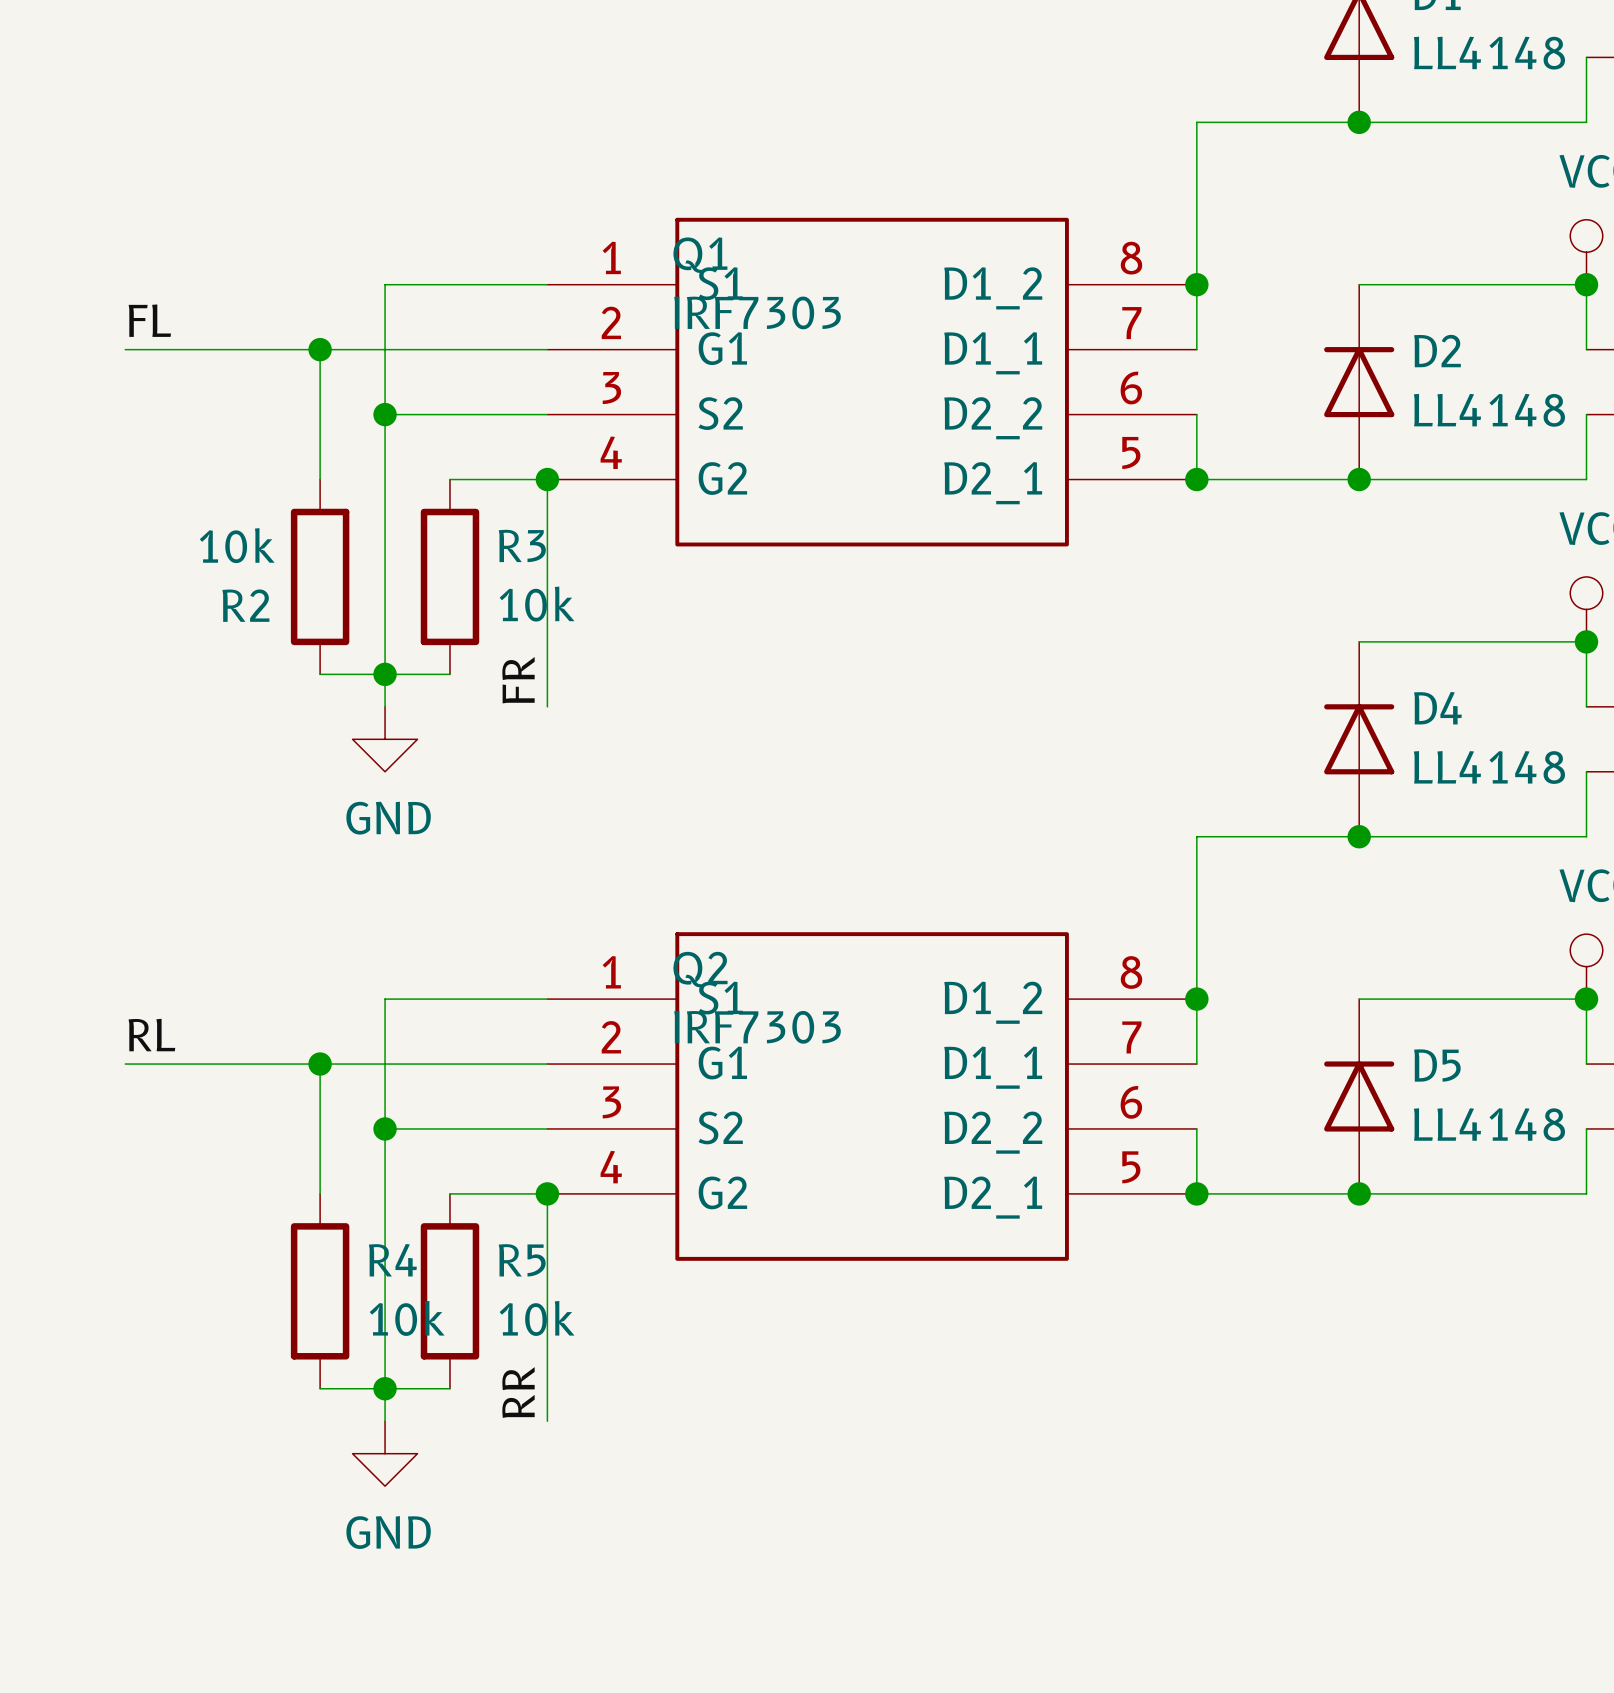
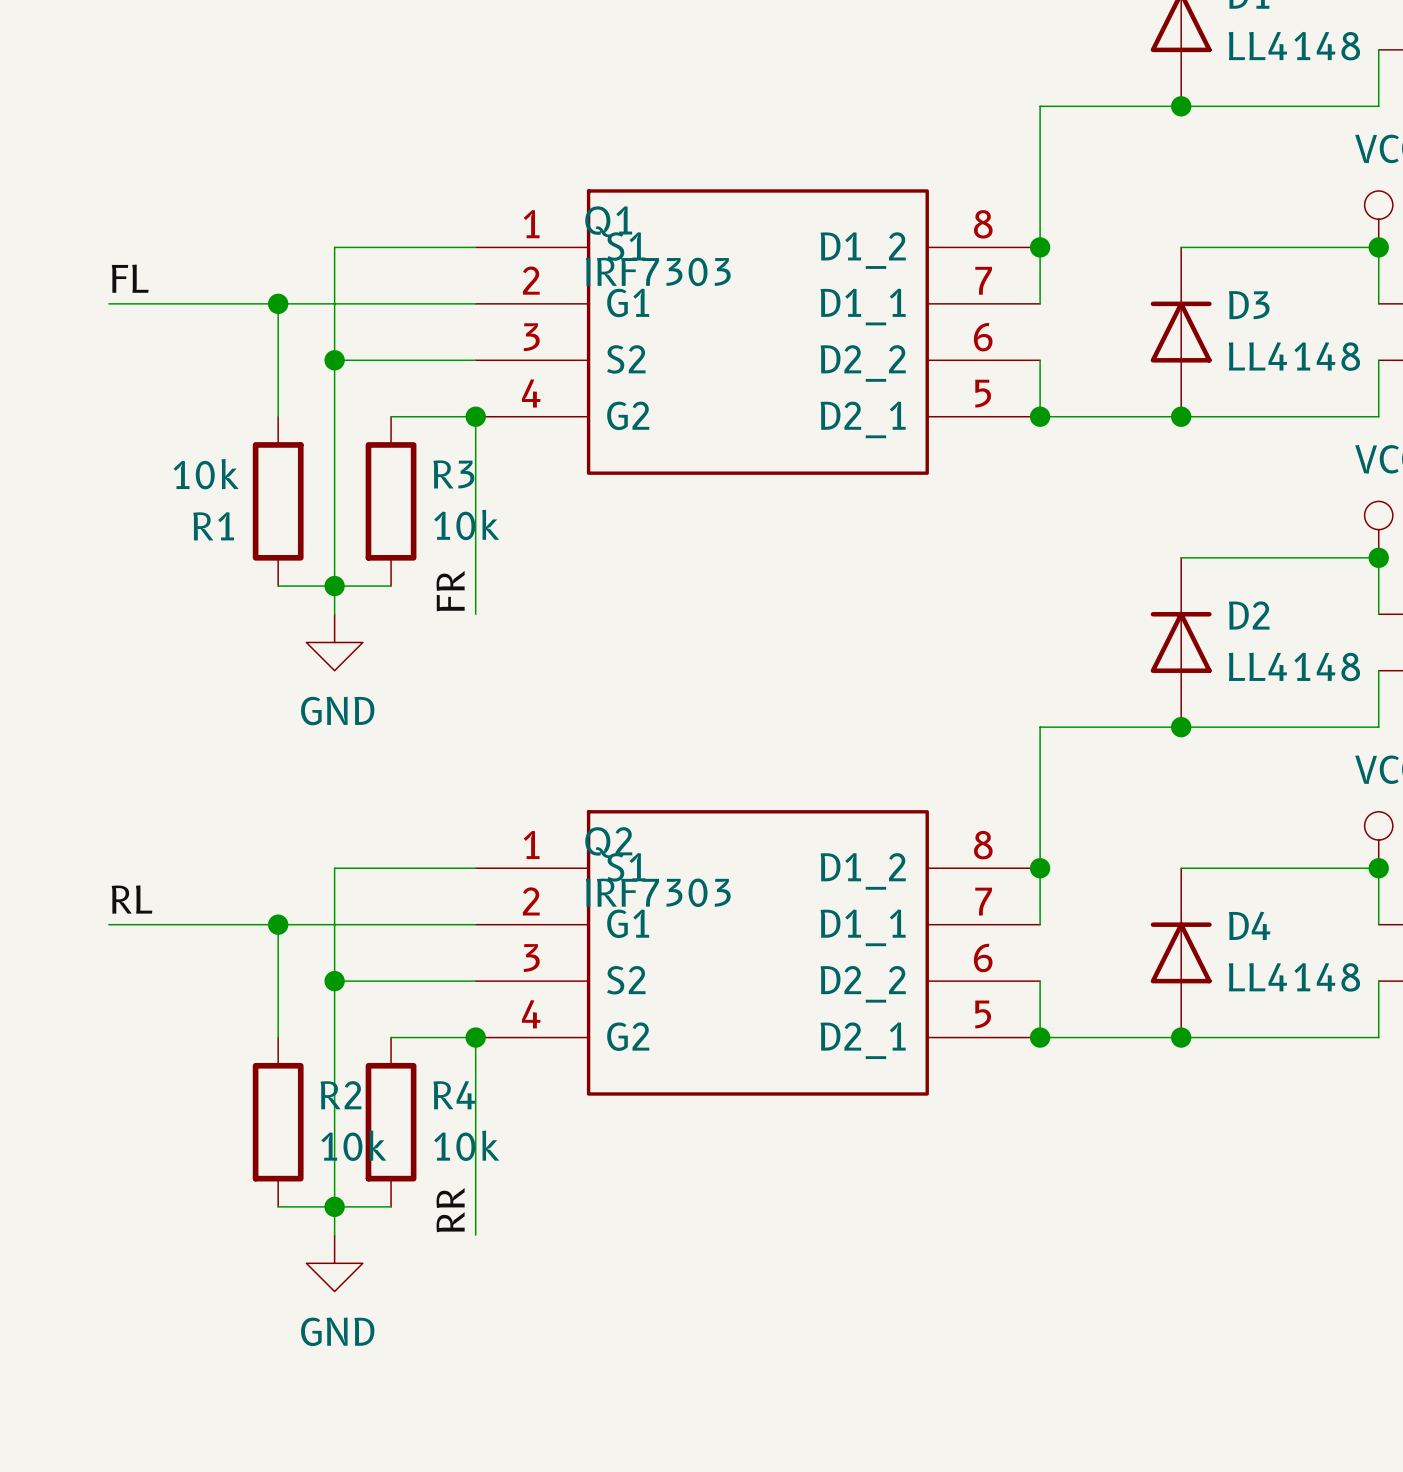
D2 name: D2 (1437, 351) -> D3 (1249, 305)
R2 name: R2 (245, 605) -> R1 (213, 526)
D4 name: D4 (1437, 708) -> D2 (1249, 615)
D5 name: D5 (1437, 1065) -> D4 (1249, 925)
R4 name: R4 (392, 1260) -> R2 (340, 1095)
R5 name: R5 (522, 1260) -> R4 (454, 1095)

